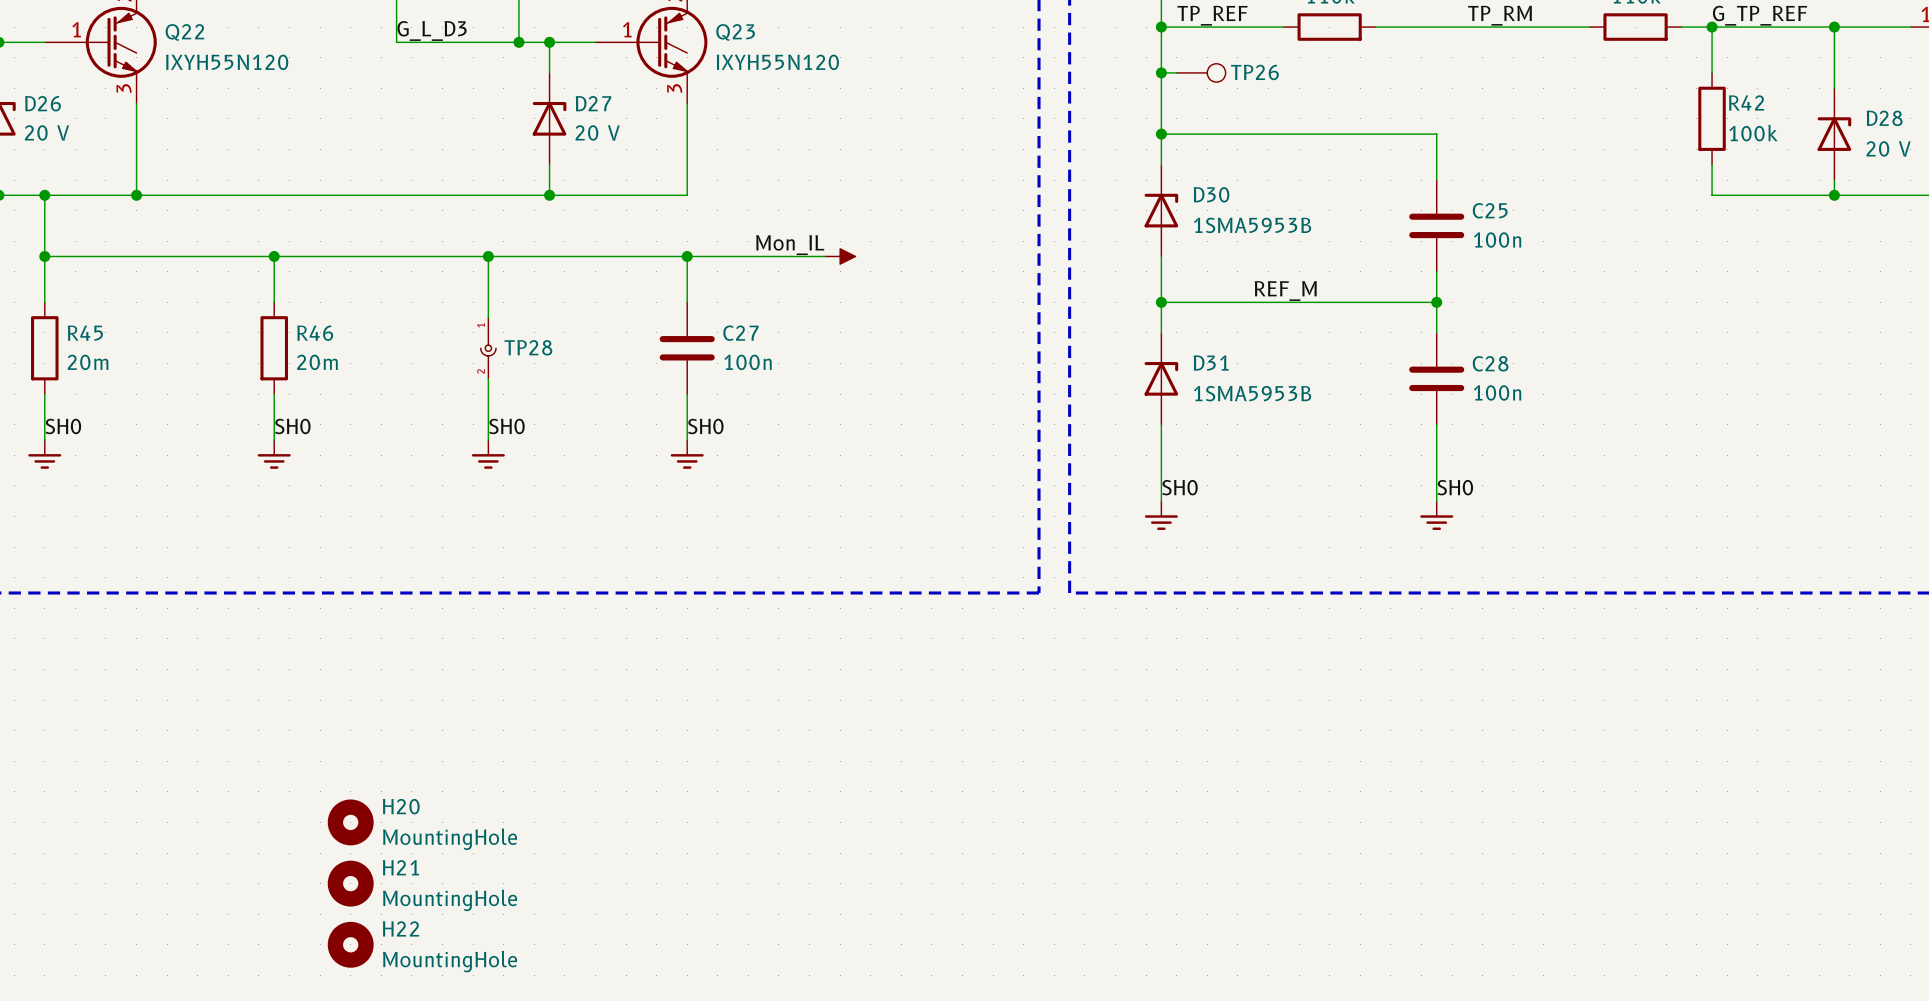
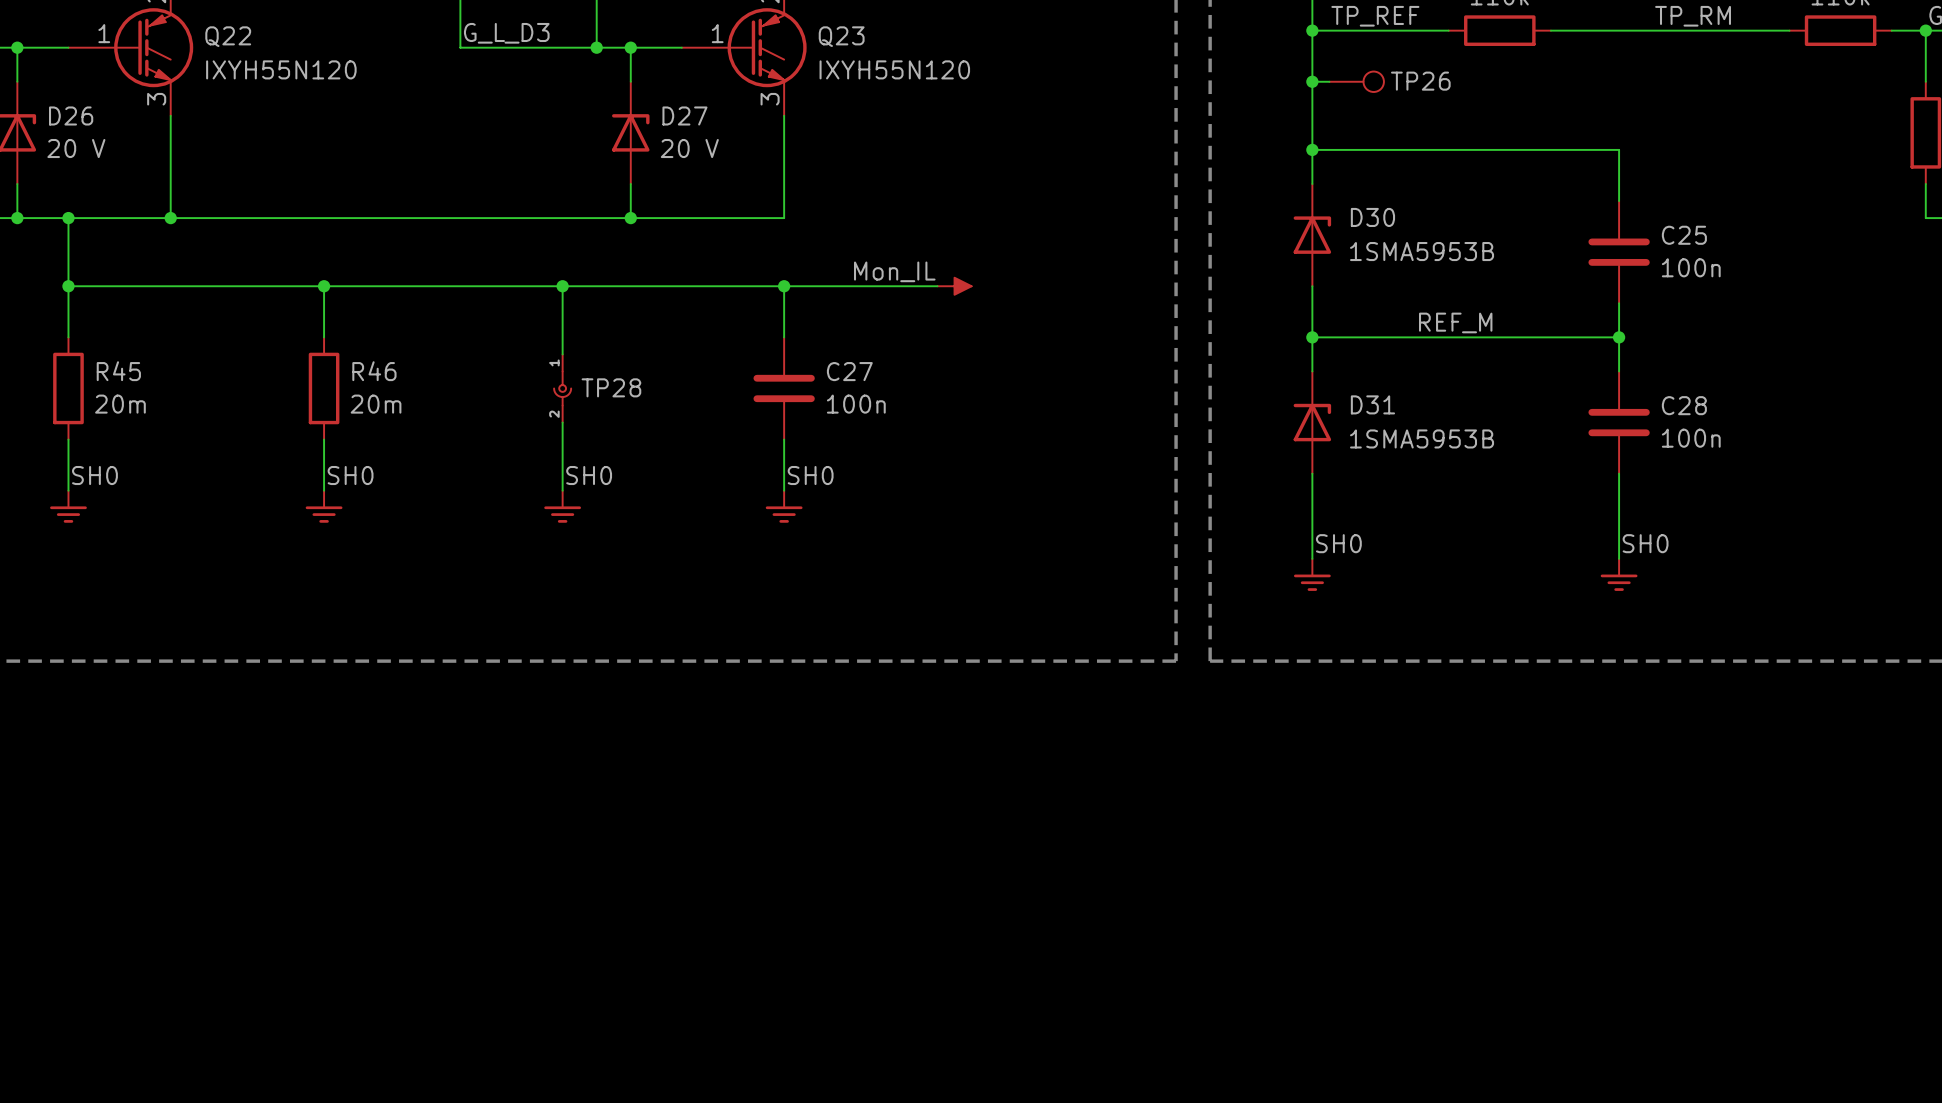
H20: MountingHole (350, 822) -> none
H21: MountingHole (350, 883) -> none
H22: MountingHole (350, 944) -> none

